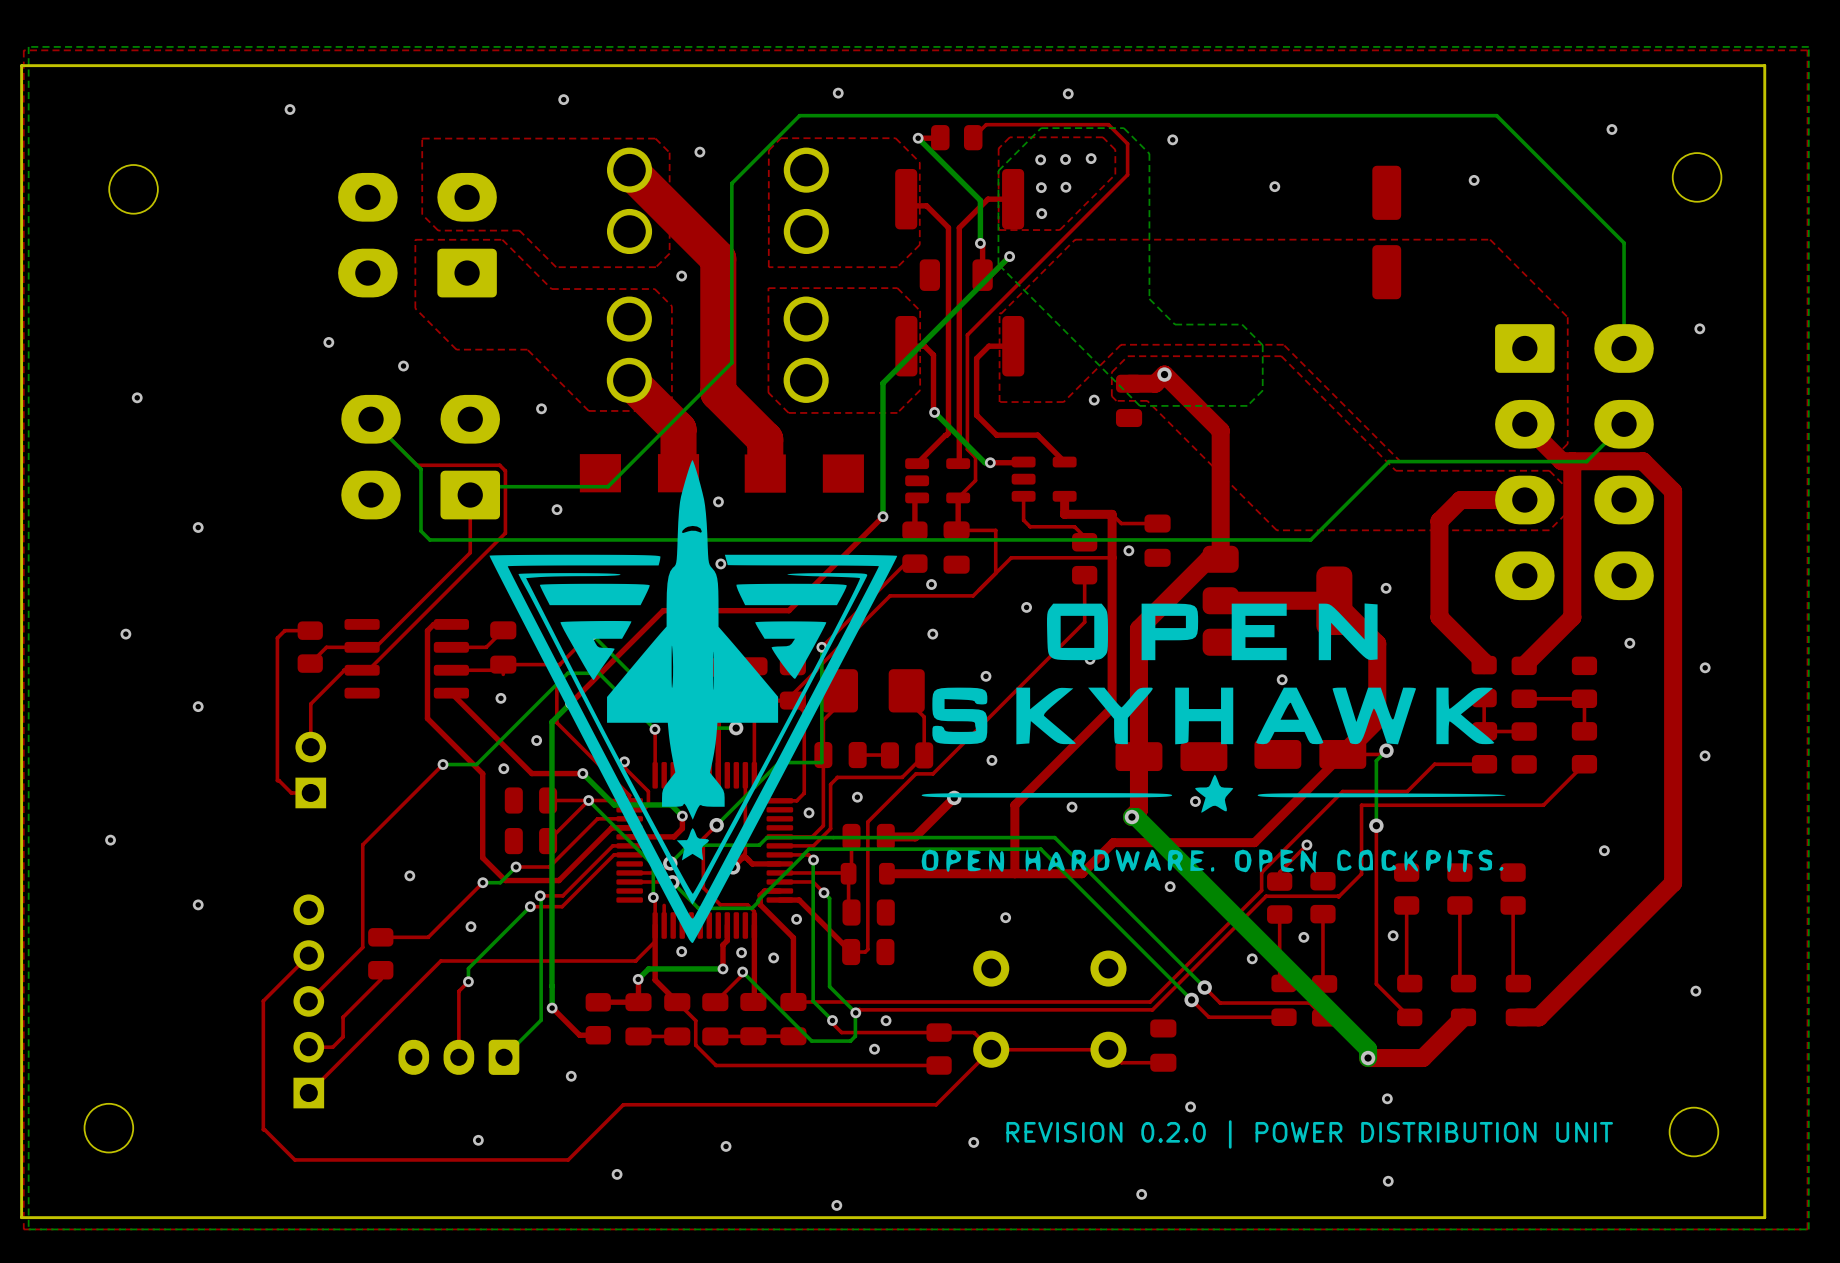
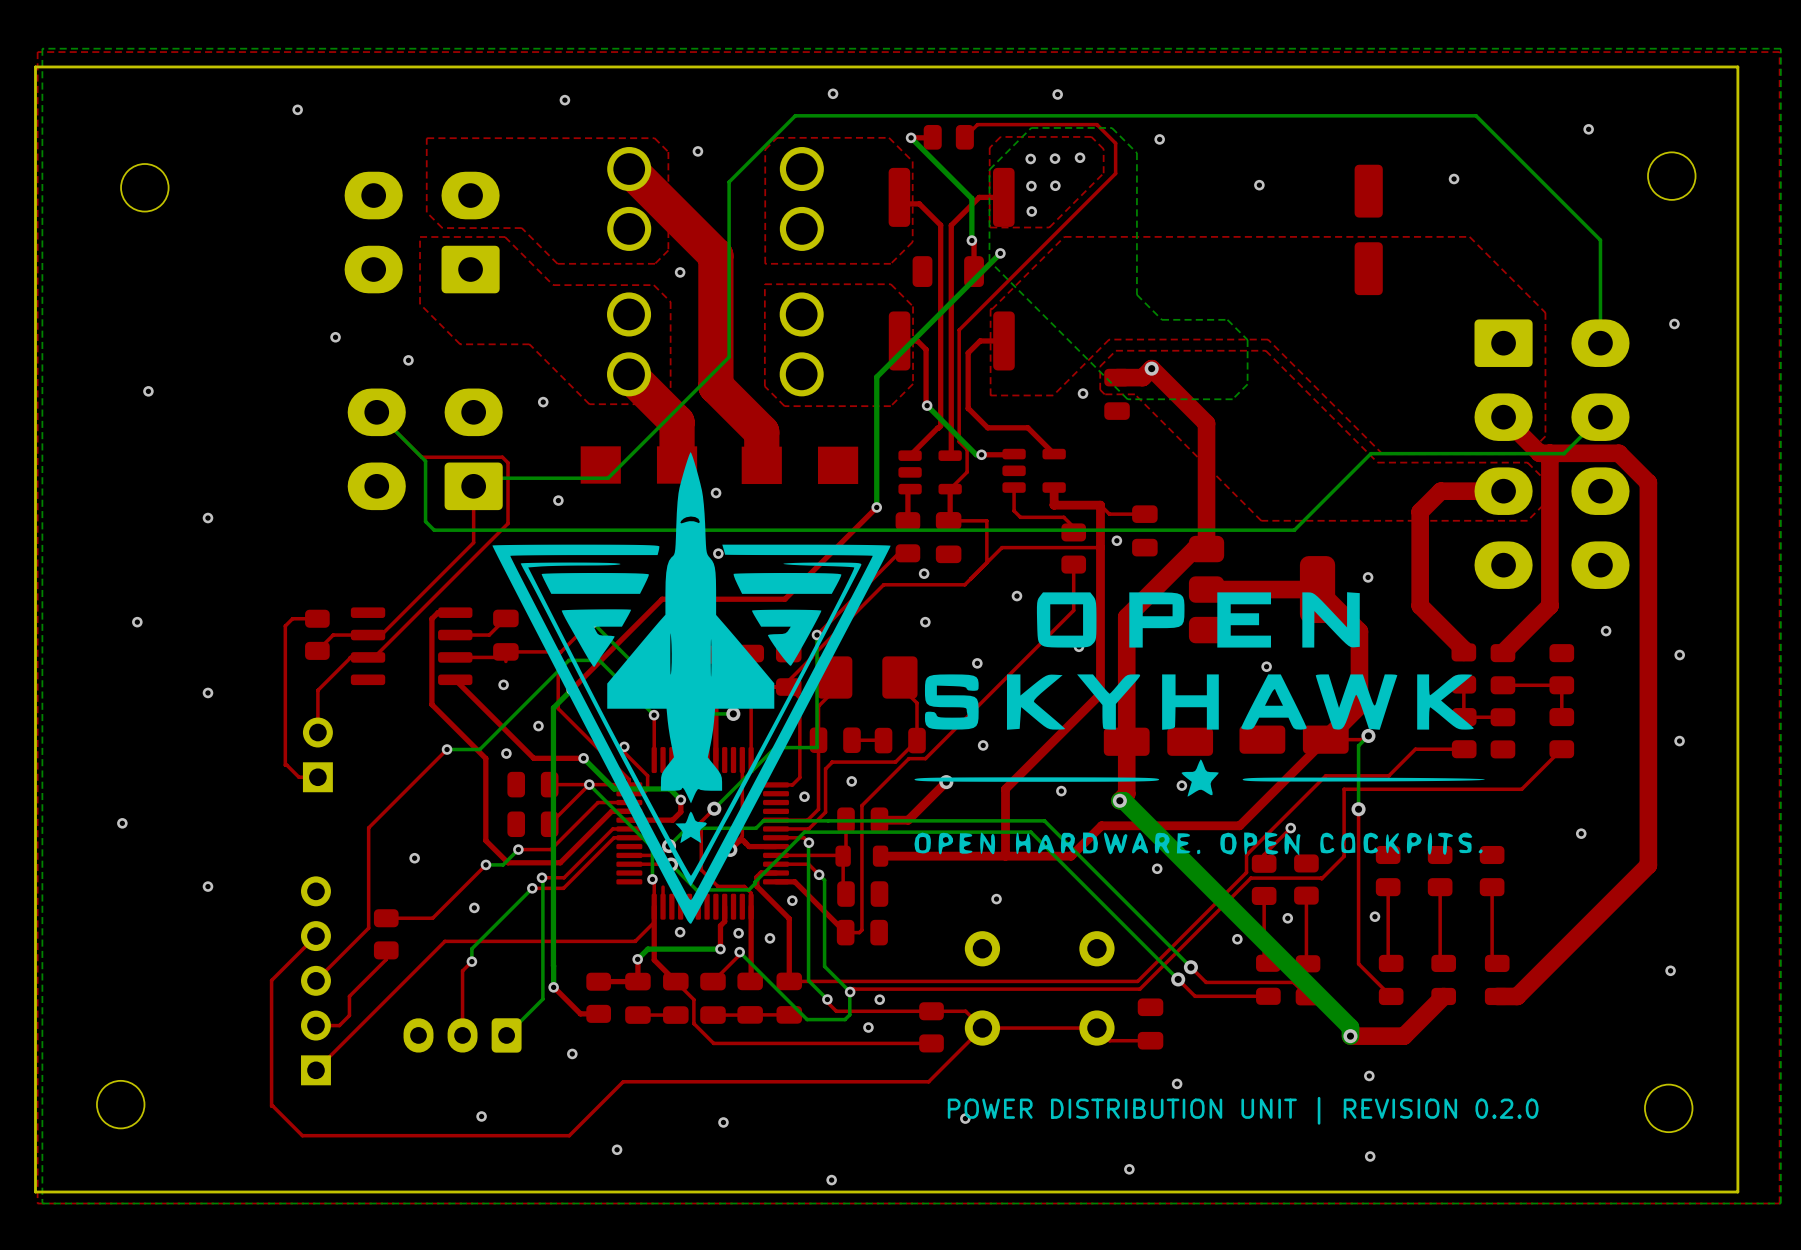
text: none -> POWER DISTRIBUTION UNIT | REVISION 0.2.0 (1243, 1110)
text: REVISION 0.2.0 | POWER DISTRIBUTION UNIT (1309, 1134) -> none

